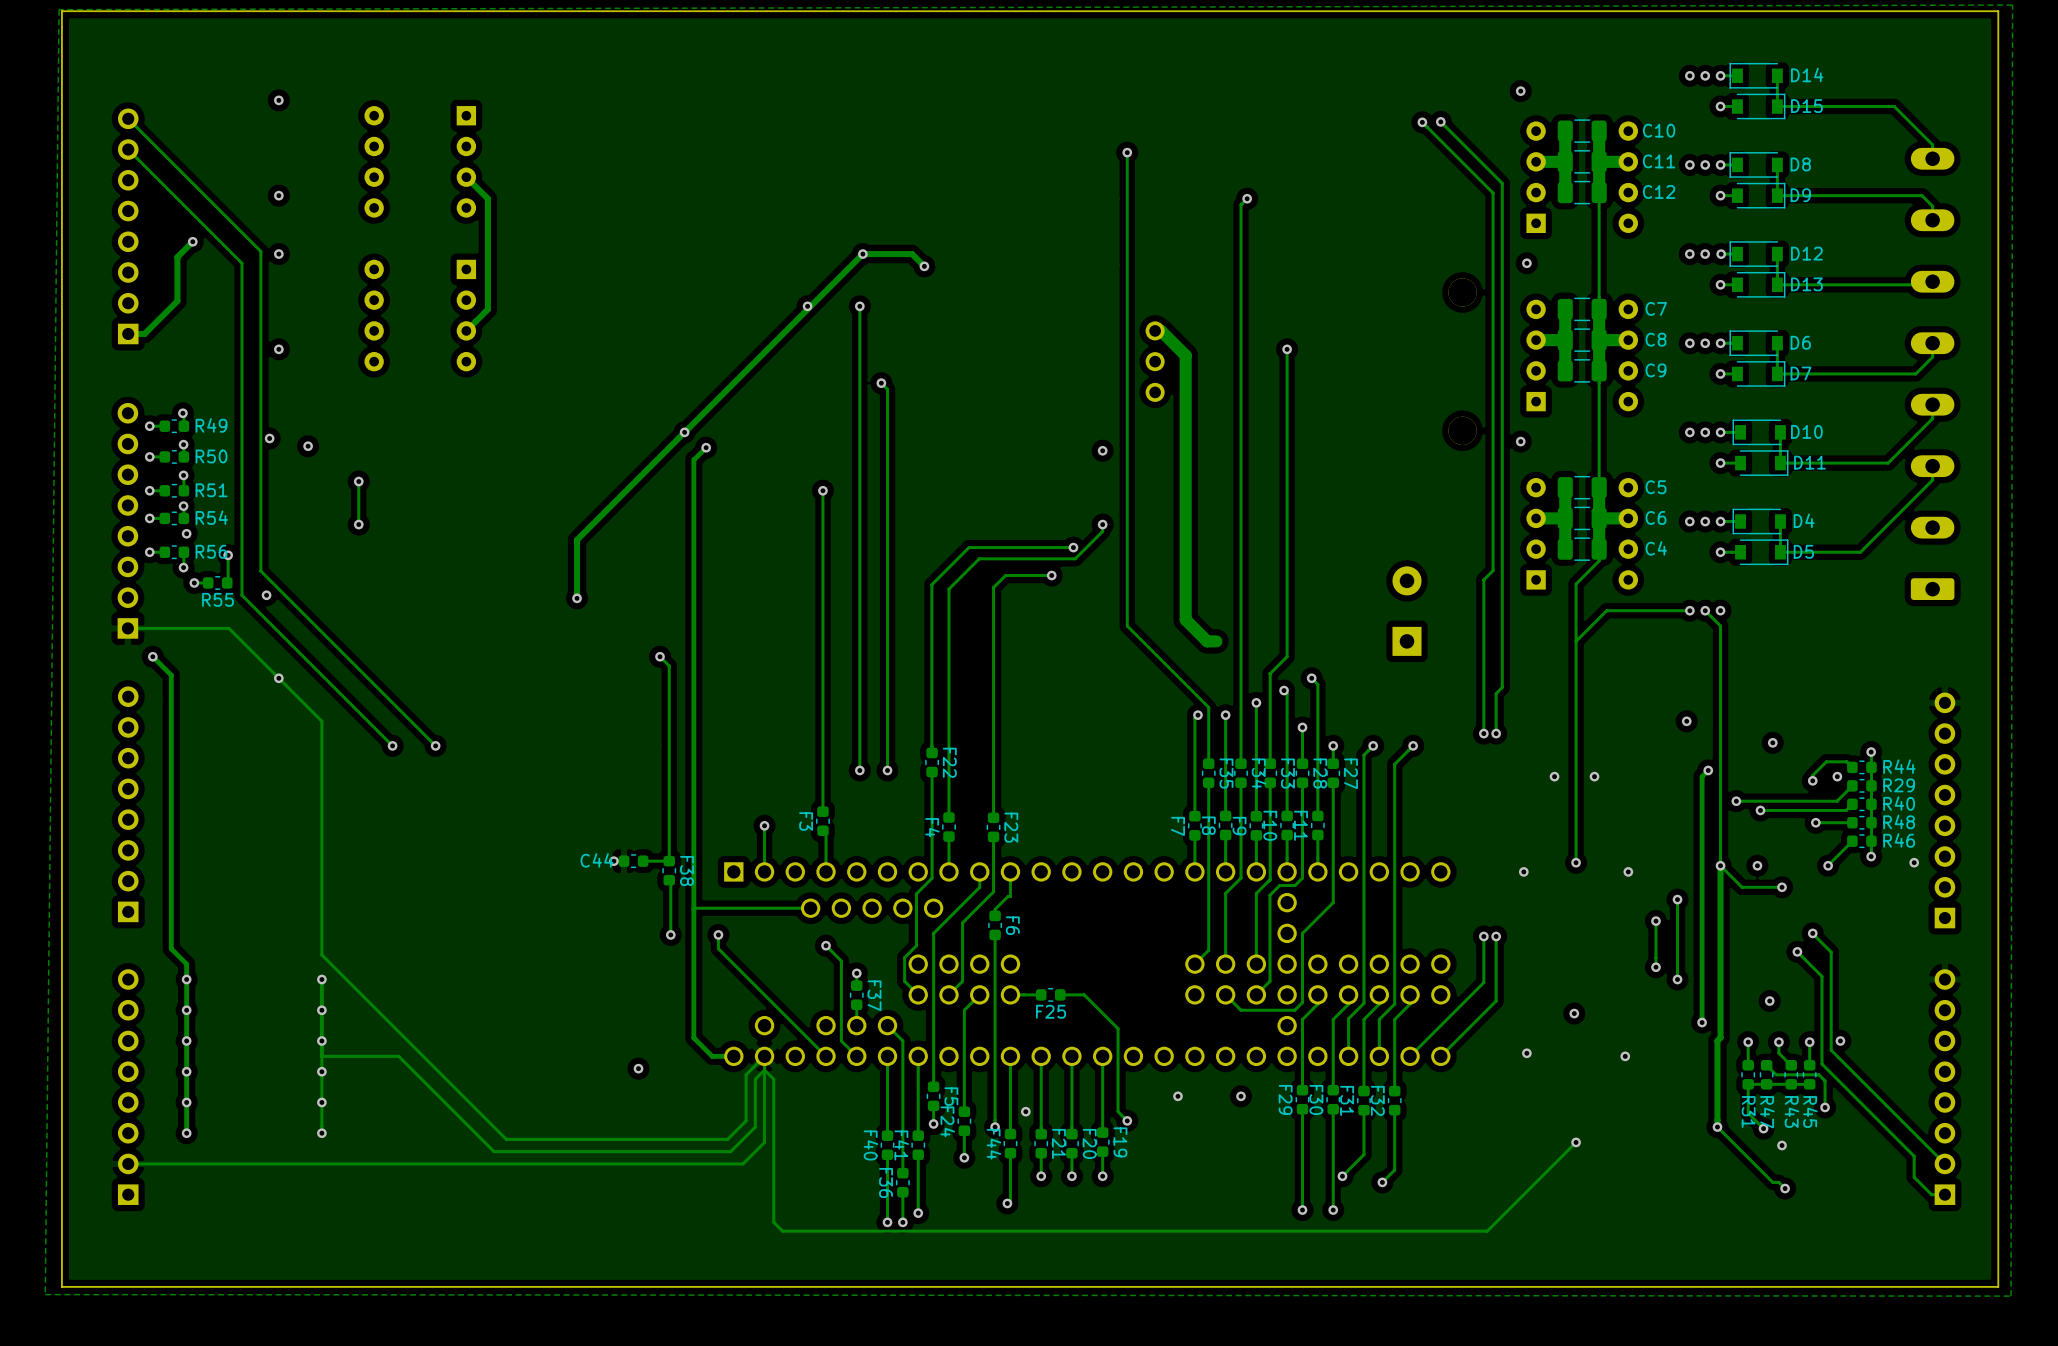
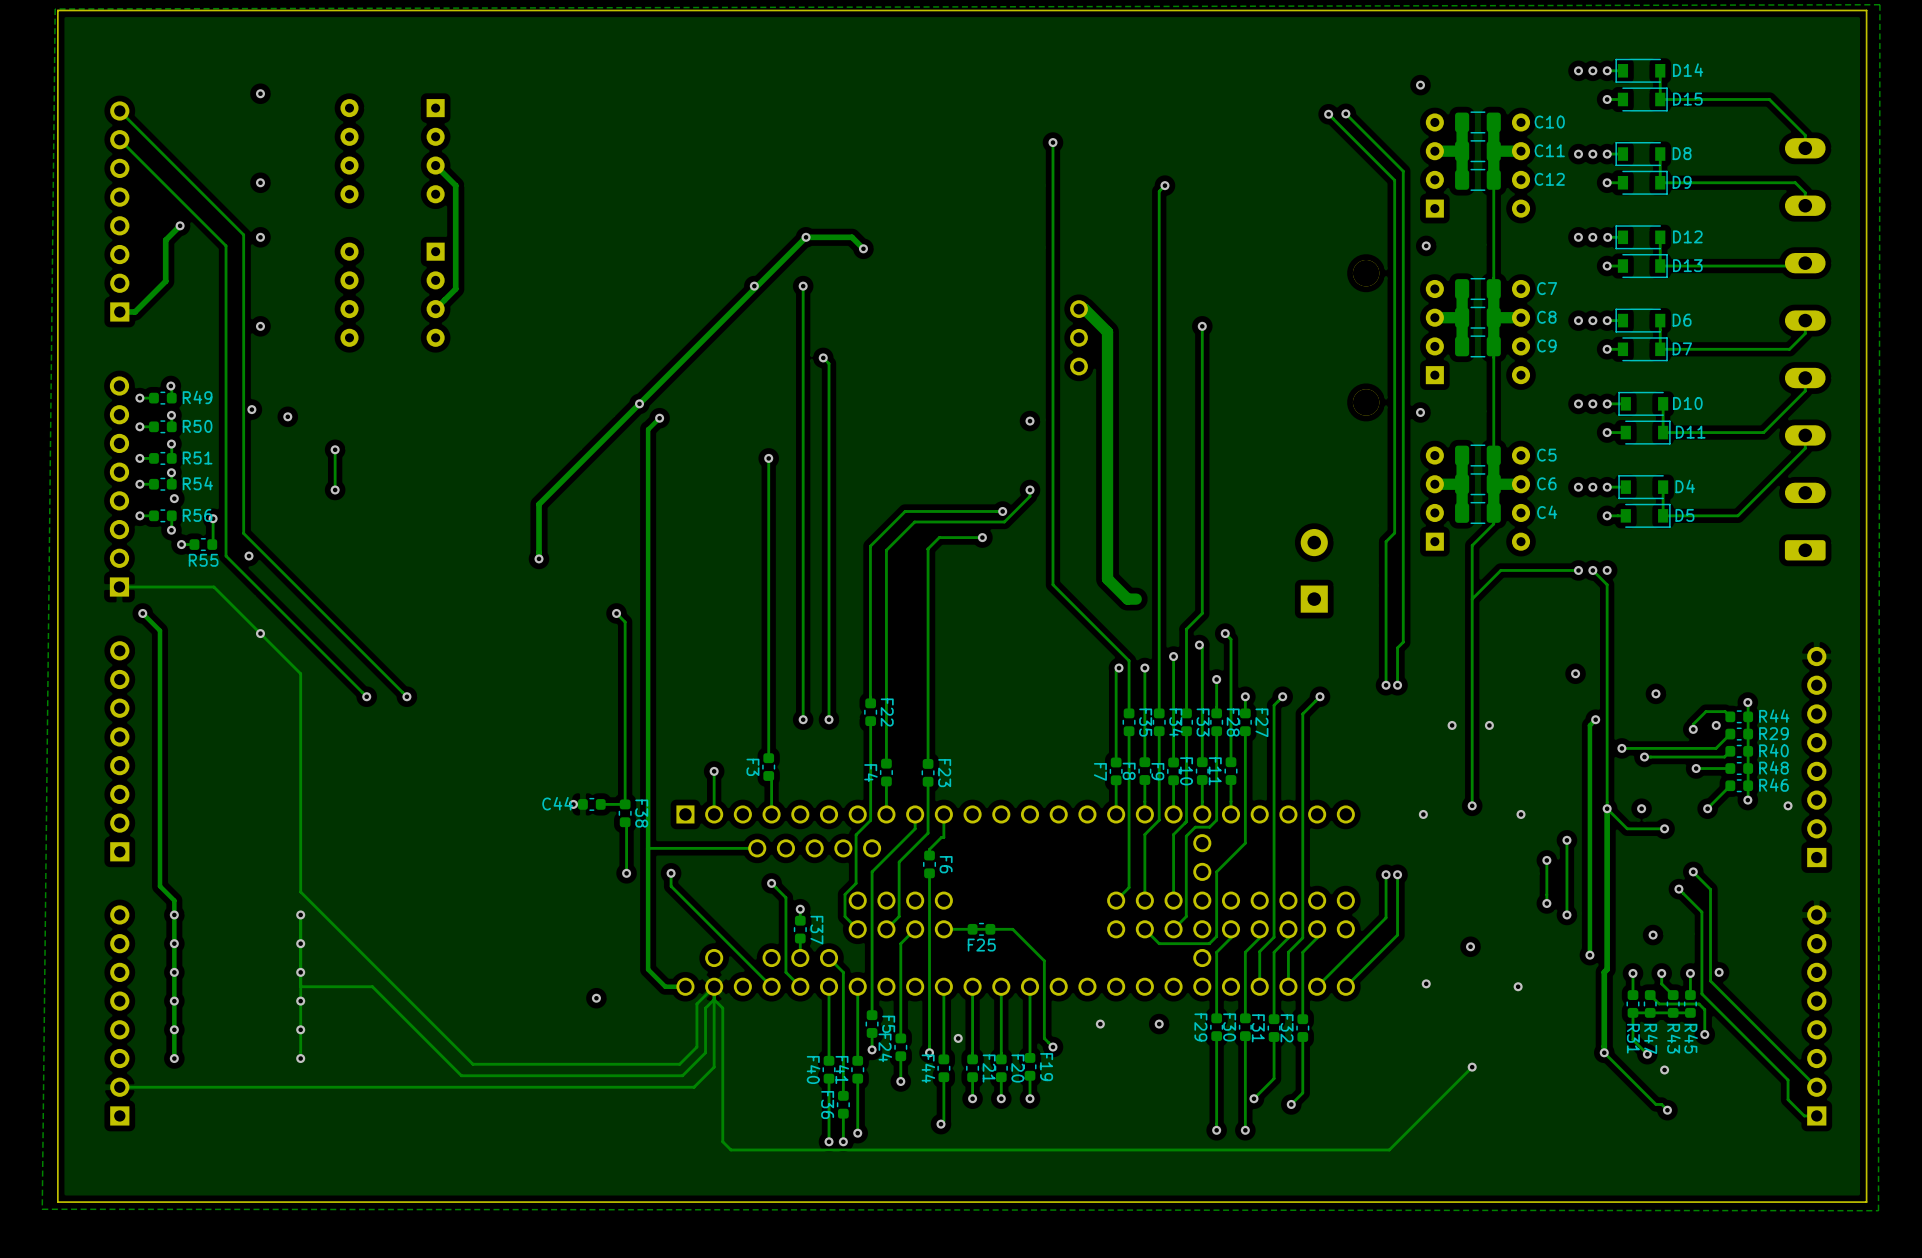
track: none -> (990, 929) (972, 929)

